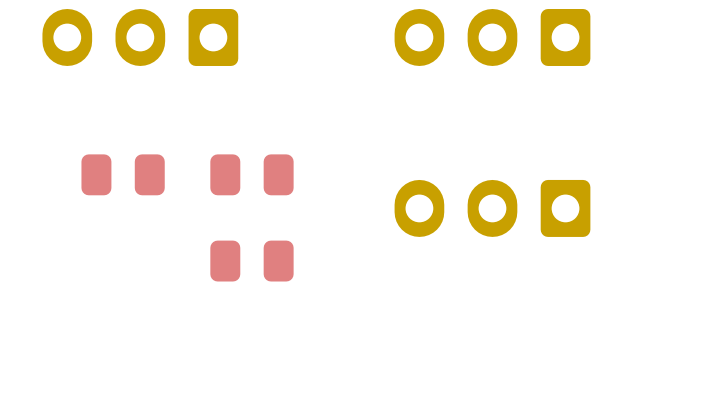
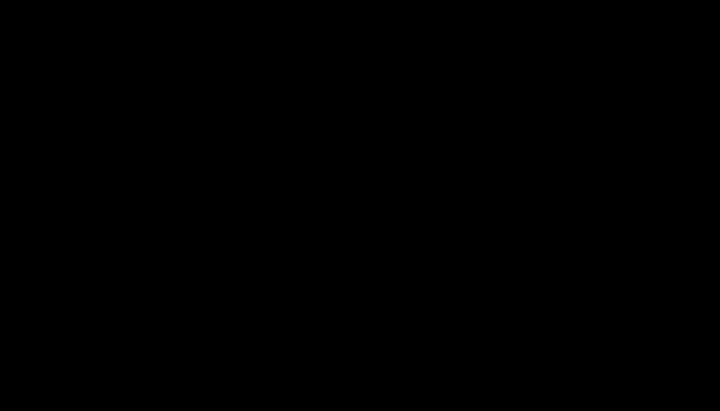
part: (140, 37) -> none
part: (492, 37) -> none
part: (123, 174) -> none
part: (251, 174) -> none
part: (492, 208) -> none
part: (251, 261) -> none

